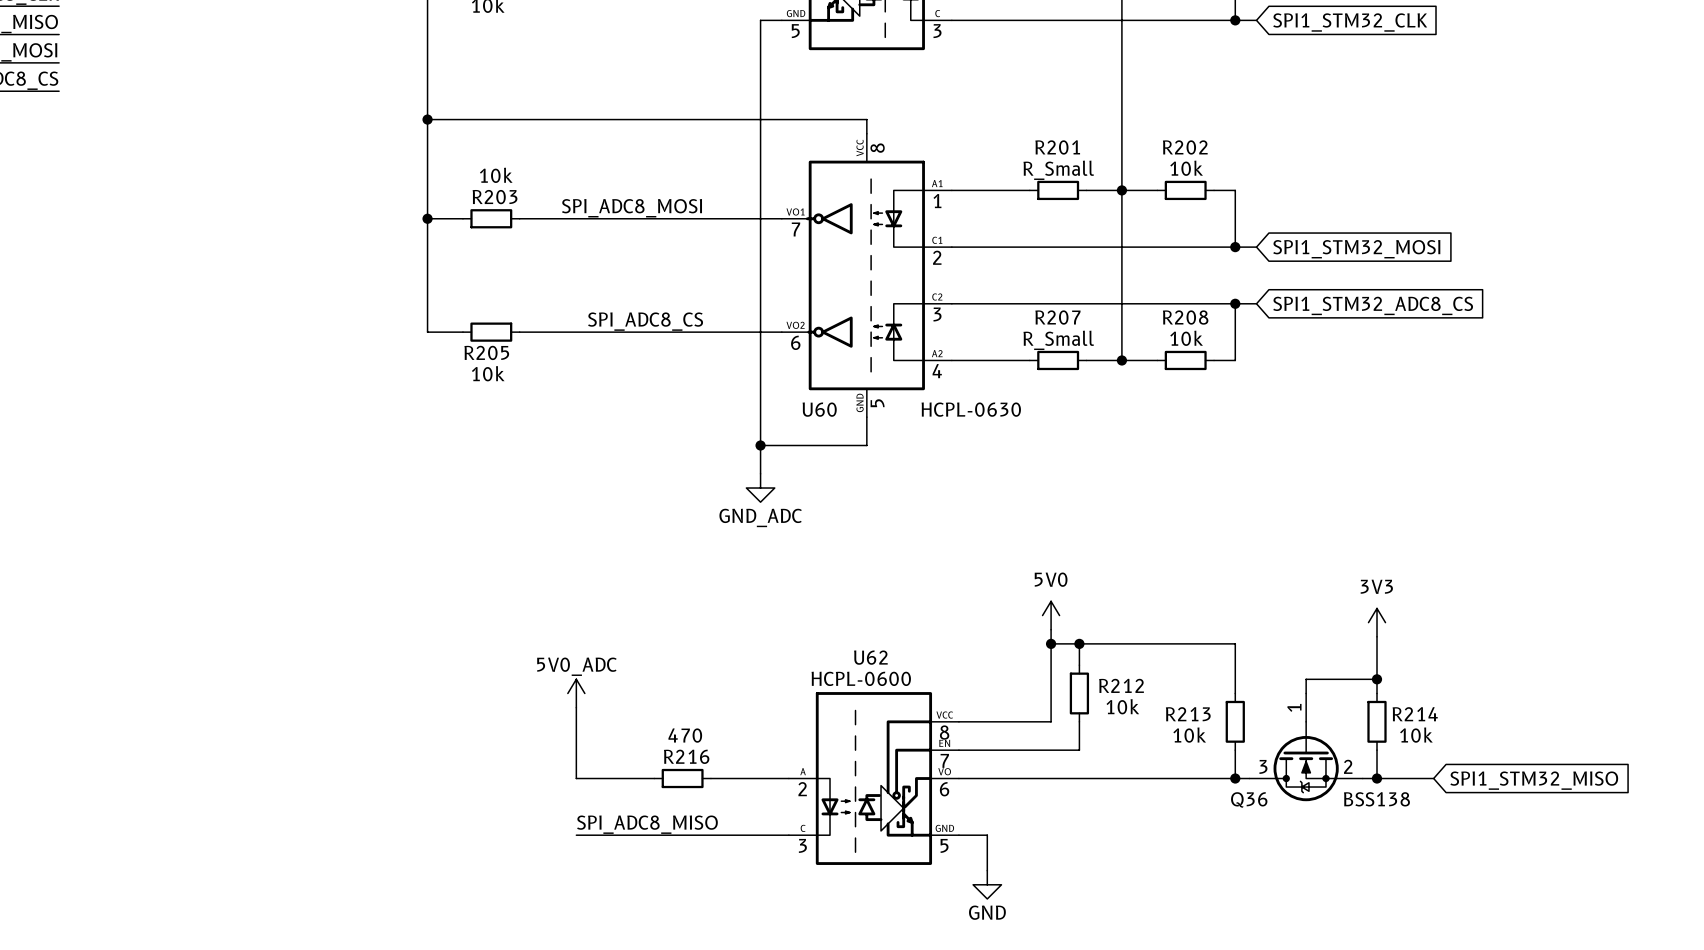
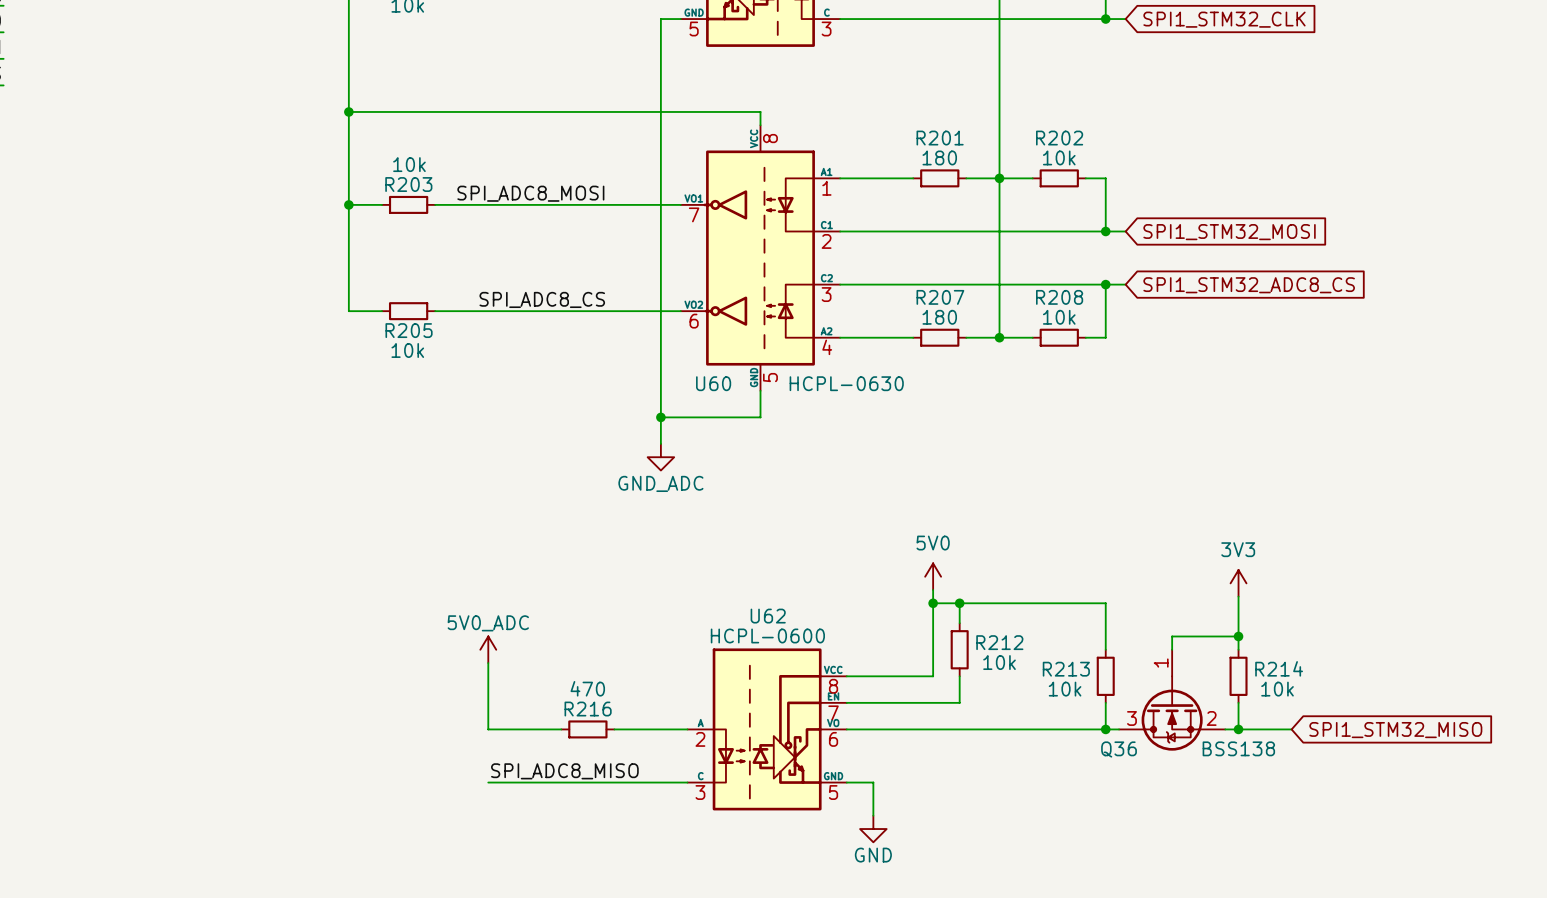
R201 value: R_Small (1058, 170) -> 180 (939, 157)
R207 value: R_Small (1058, 340) -> 180 (939, 317)

